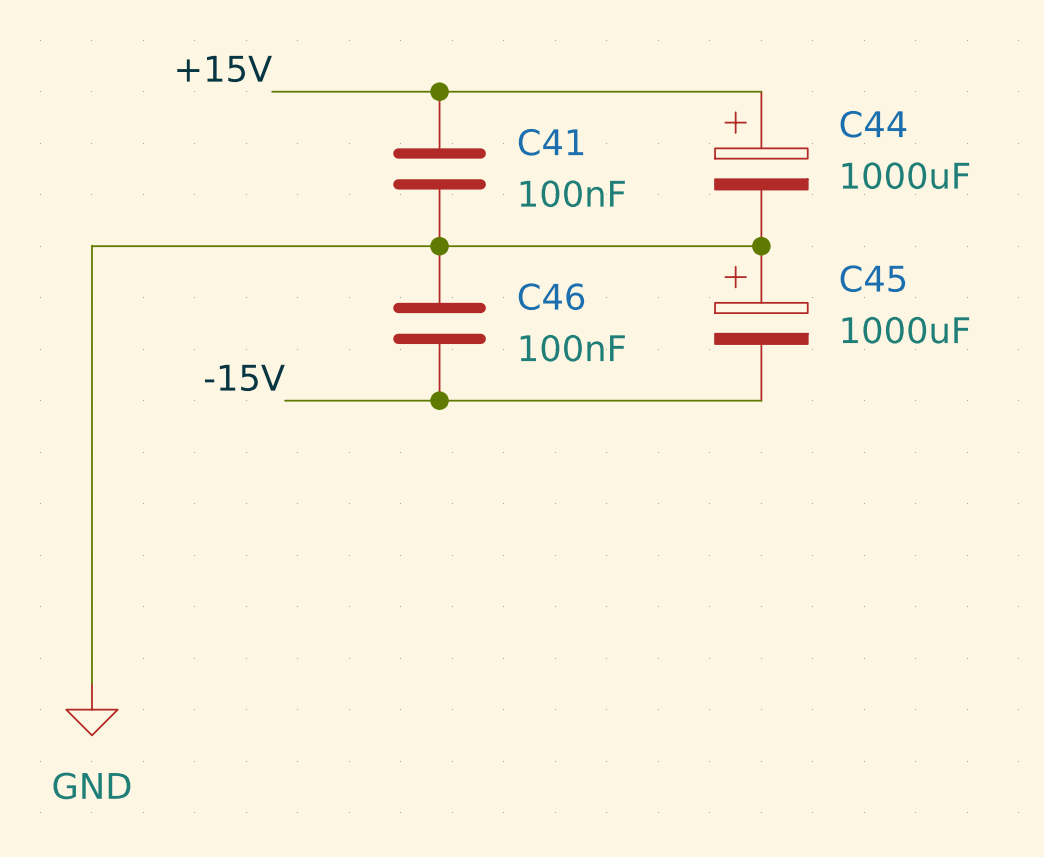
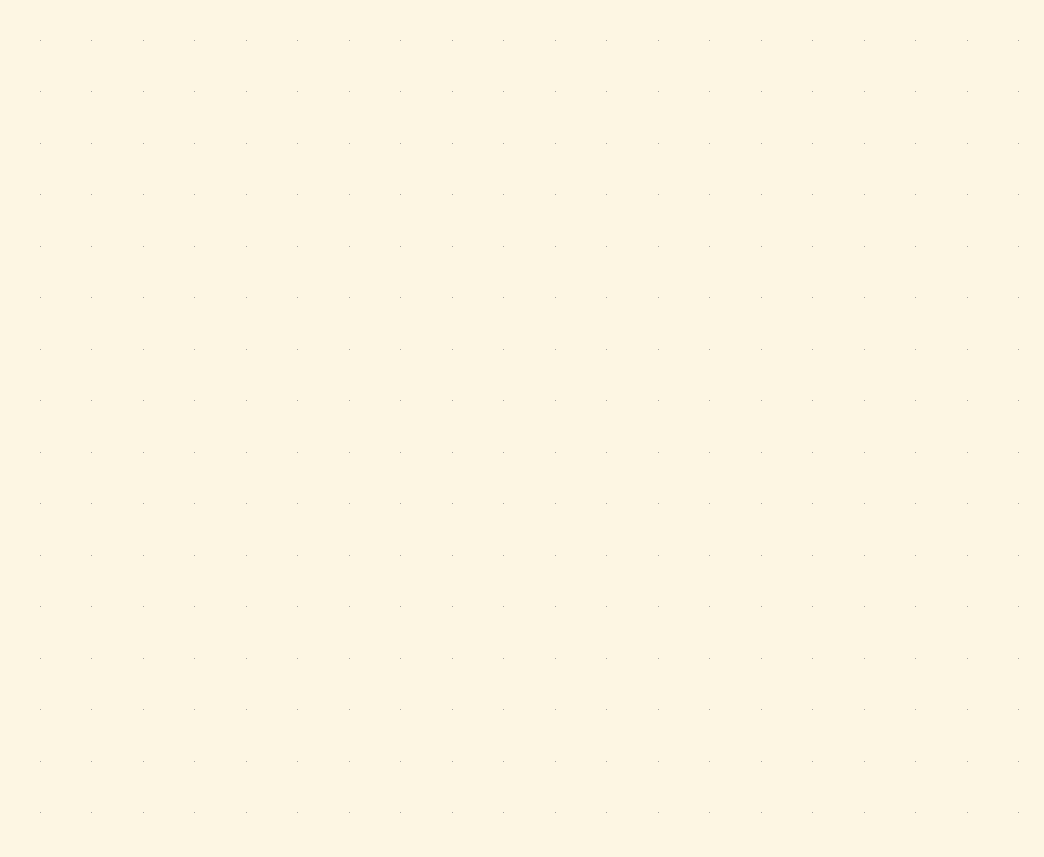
label: +15V (224, 68) -> none
wire: (272, 91) (761, 91) -> none
junction: (439, 91) -> none
C41: 100nF (439, 168) -> none
C44: 1000uF (761, 168) -> none
junction: (439, 246) -> none
wire: (761, 246) (91, 246) (91, 683) -> none
junction: (761, 246) -> none
C46: 100nF (439, 323) -> none
C45: 1000uF (761, 323) -> none
label: -15V (244, 377) -> none
wire: (285, 400) (761, 400) -> none
junction: (439, 400) -> none
power symbol: GND (91, 709) -> none

